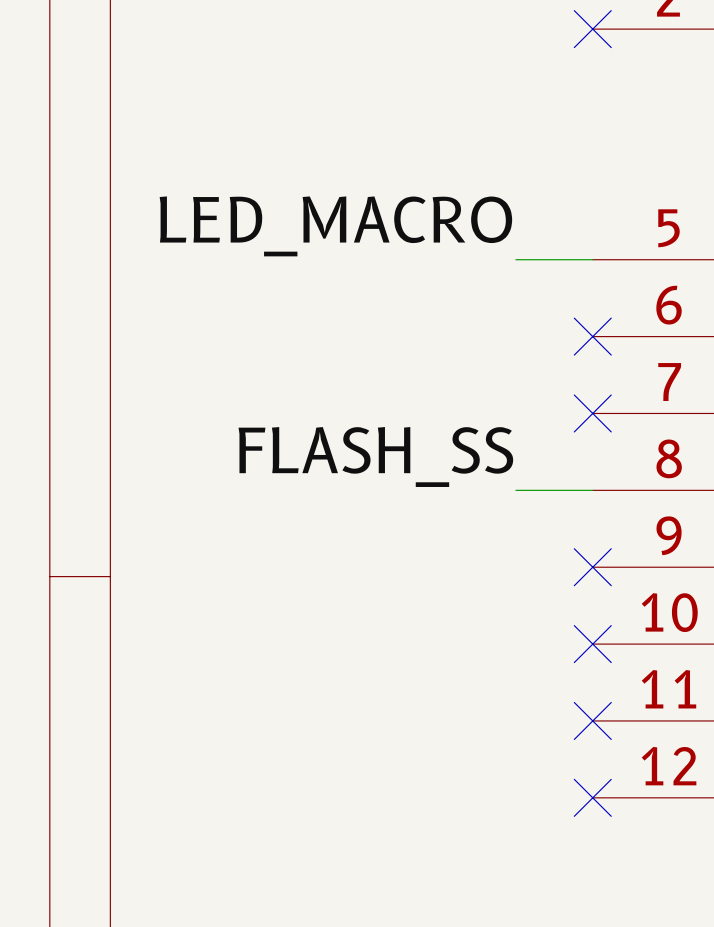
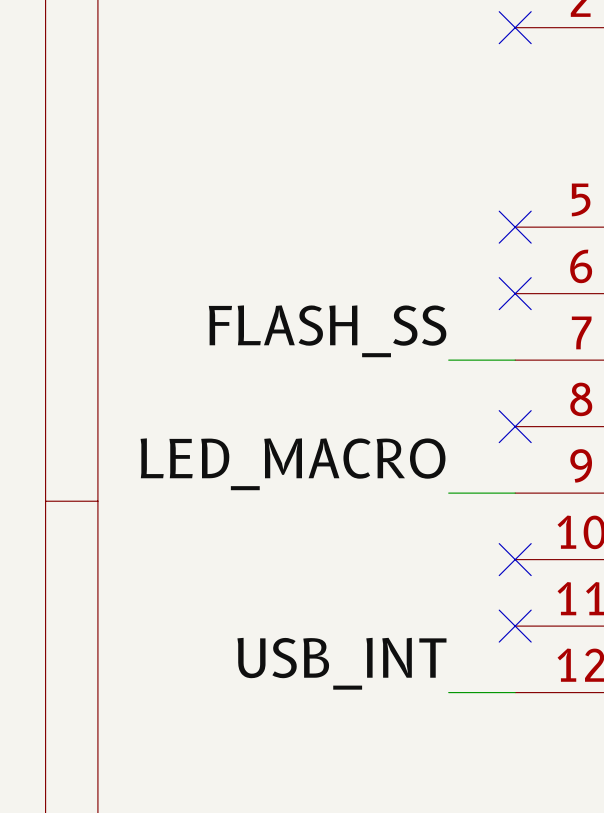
label position: LED_MACRO (335, 226) -> LED_MACRO (293, 464)
wire: (515, 259) (592, 259) -> (448, 493) (515, 493)
no-connect mark: none -> (515, 227)
wire: none -> (448, 360) (515, 360)
no-connect mark: (592, 413) -> none
label position: FLASH_SS (375, 457) -> FLASH_SS (327, 331)
wire: (515, 490) (592, 490) -> (448, 692) (515, 692)
no-connect mark: none -> (515, 426)
no-connect mark: (592, 567) -> none
label: none -> USB_INT (341, 663)
no-connect mark: (592, 797) -> none

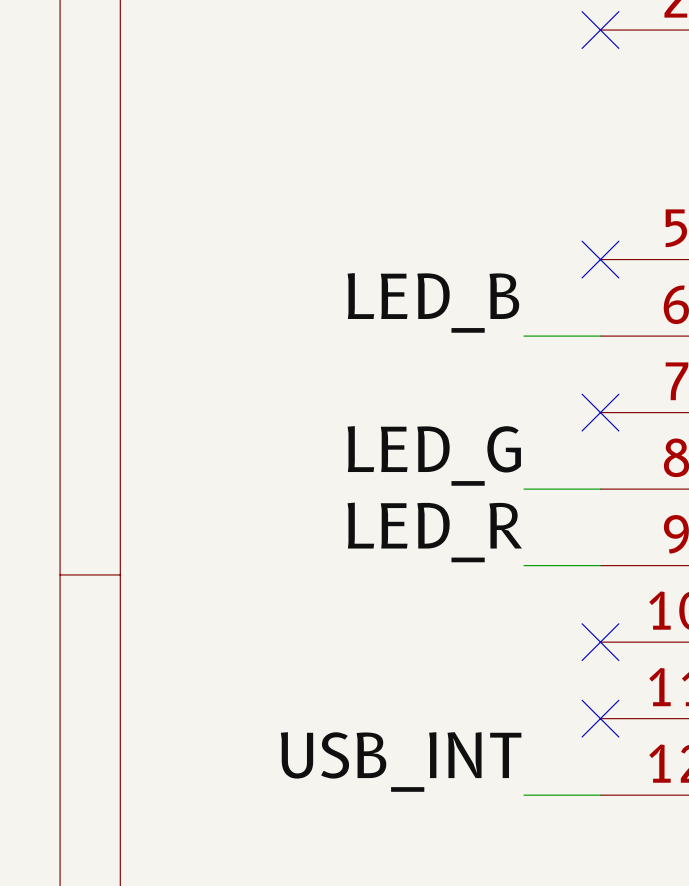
label: none -> LED_B (433, 302)
no-connect mark: (515, 293) -> none
label: FLASH_SS (327, 331) -> none
wire: (448, 360) (515, 360) -> (523, 336) (600, 336)
no-connect mark: none -> (600, 412)
label: none -> LED_G (434, 455)
wire: none -> (523, 489) (600, 489)
no-connect mark: (515, 426) -> none
label: LED_MACRO (293, 464) -> LED_R (434, 532)

